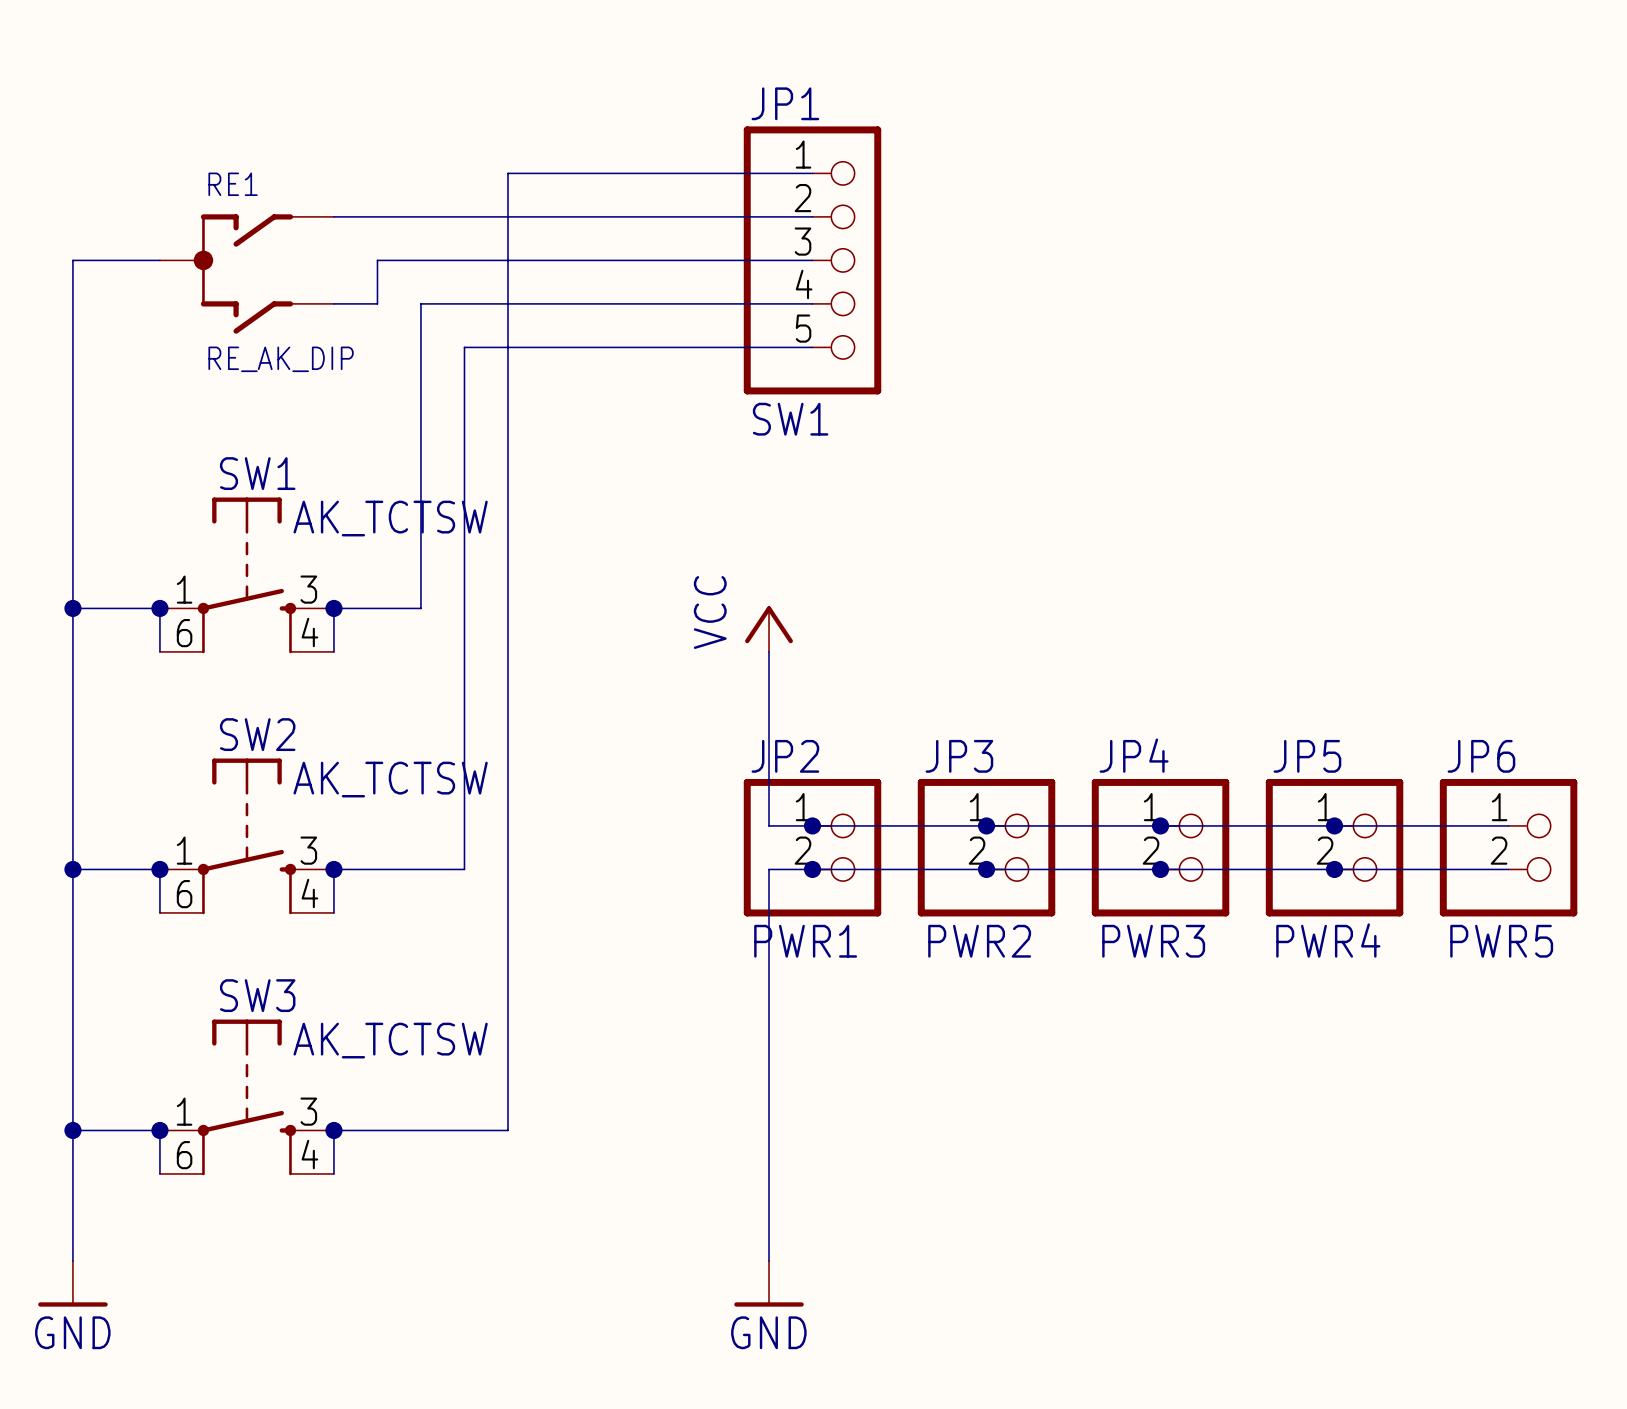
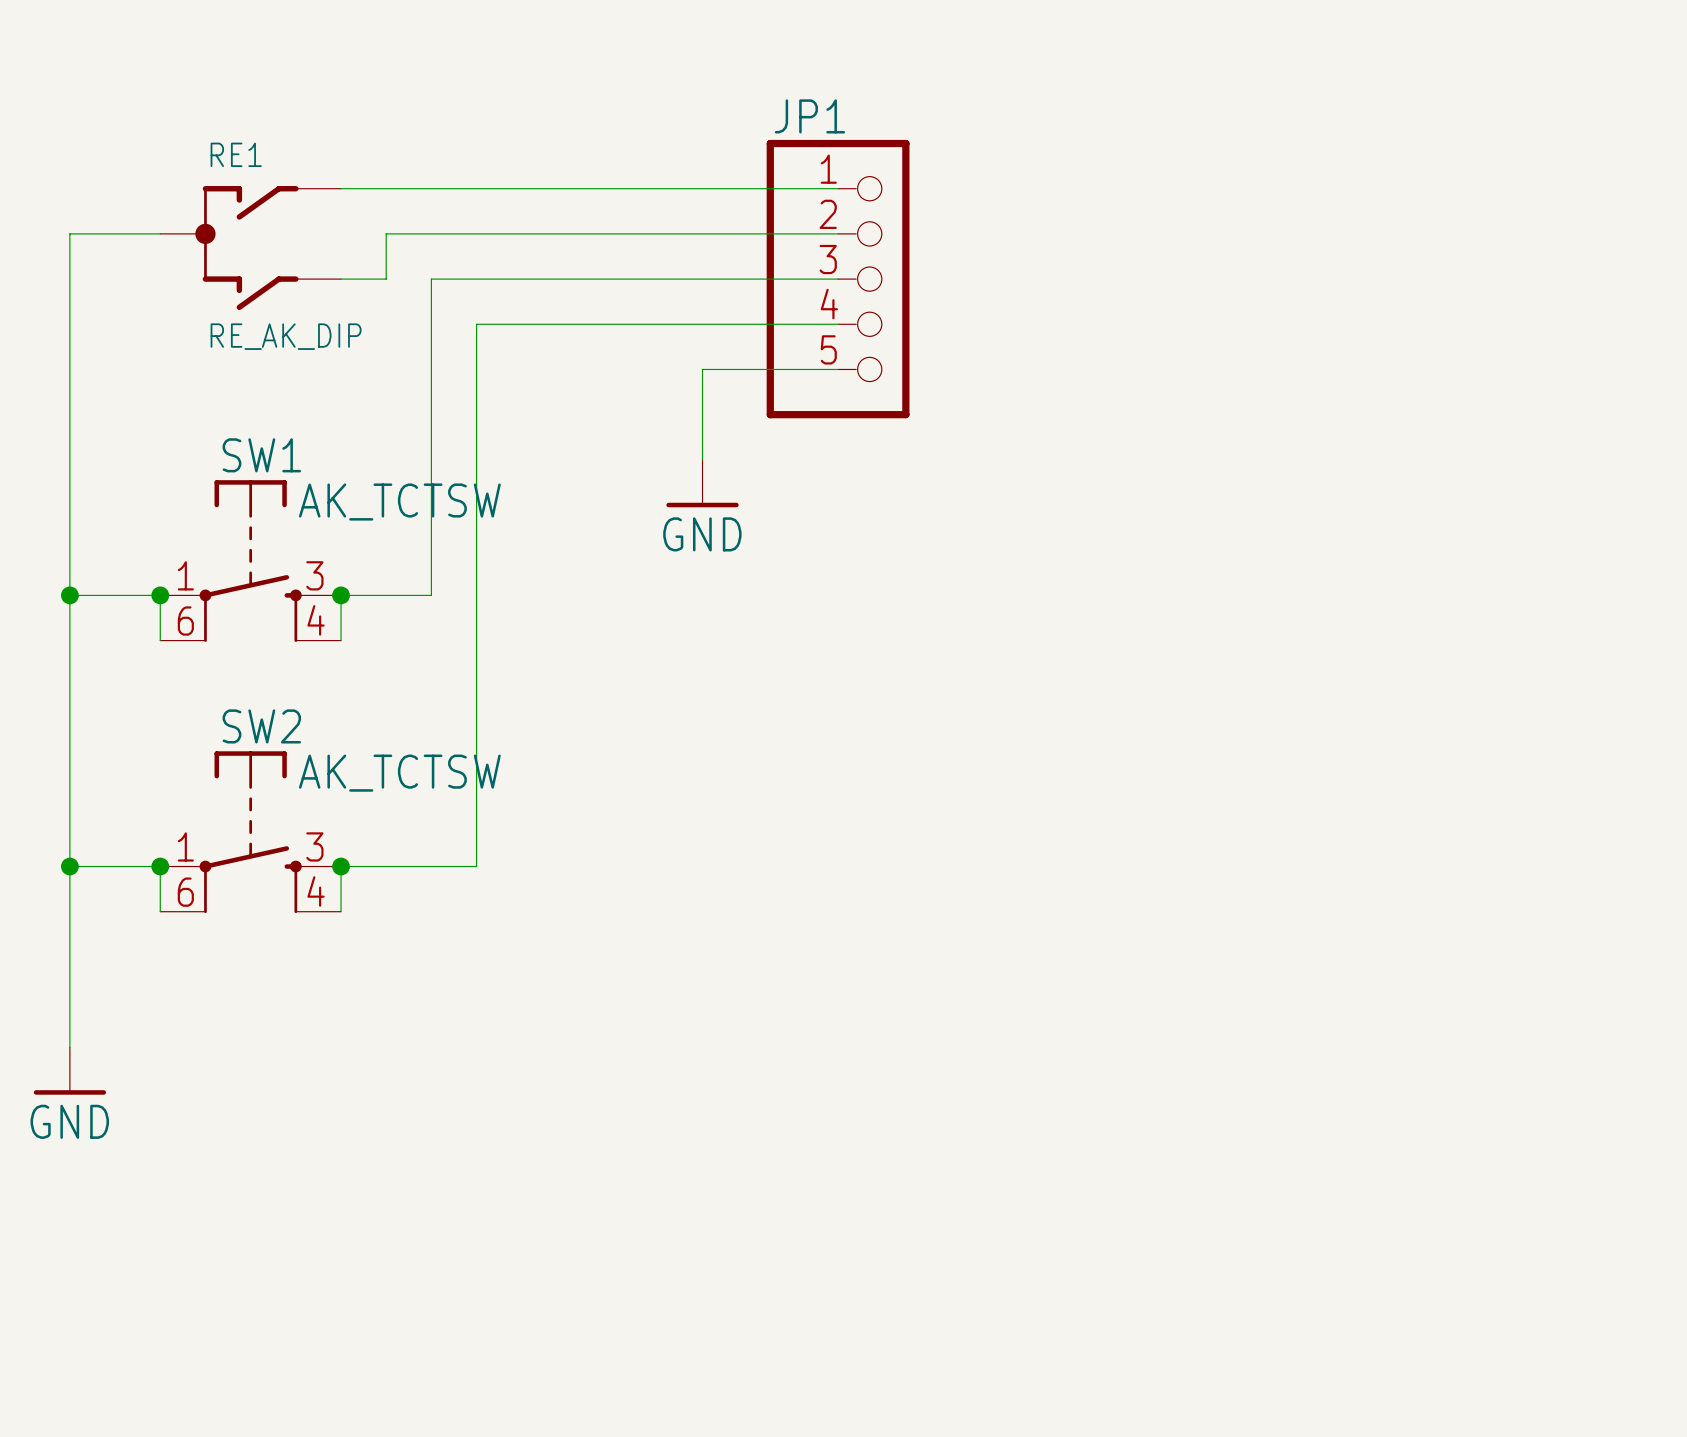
wire: (812, 173) (507, 173) (507, 1130) (333, 1130) (333, 1173) -> none
JP1 position: (812, 260) -> (838, 279)
wire: none -> (838, 369) (702, 369) (702, 459)
JP1 value: SW1 (790, 419) -> none
power symbol: none -> GND (702, 483)
power symbol: VCC (769, 629) -> none
wire: (769, 651) (769, 825) (1508, 825) -> none
junction: (812, 825) -> none
junction: (986, 825) -> none
junction: (1160, 825) -> none
junction: (1334, 825) -> none
JP2: PWR1 (812, 847) -> none
JP3: PWR2 (986, 847) -> none
JP4: PWR3 (1160, 847) -> none
JP5: PWR4 (1334, 847) -> none
JP6: PWR5 (1508, 847) -> none
junction: (812, 869) -> none
junction: (986, 869) -> none
junction: (1160, 869) -> none
junction: (1334, 869) -> none
wire: (1508, 869) (769, 869) (769, 1260) -> none
wire: (72, 1043) (72, 1260) -> none
SW3: AK_TCTSW (246, 1097) -> none
wire: (72, 1130) (159, 1130) (159, 1173) -> none
junction: (72, 1130) -> none
junction: (159, 1130) -> none
junction: (333, 1130) -> none
power symbol position: GND (72, 1283) -> GND (69, 1070)
power symbol: GND (769, 1283) -> none

